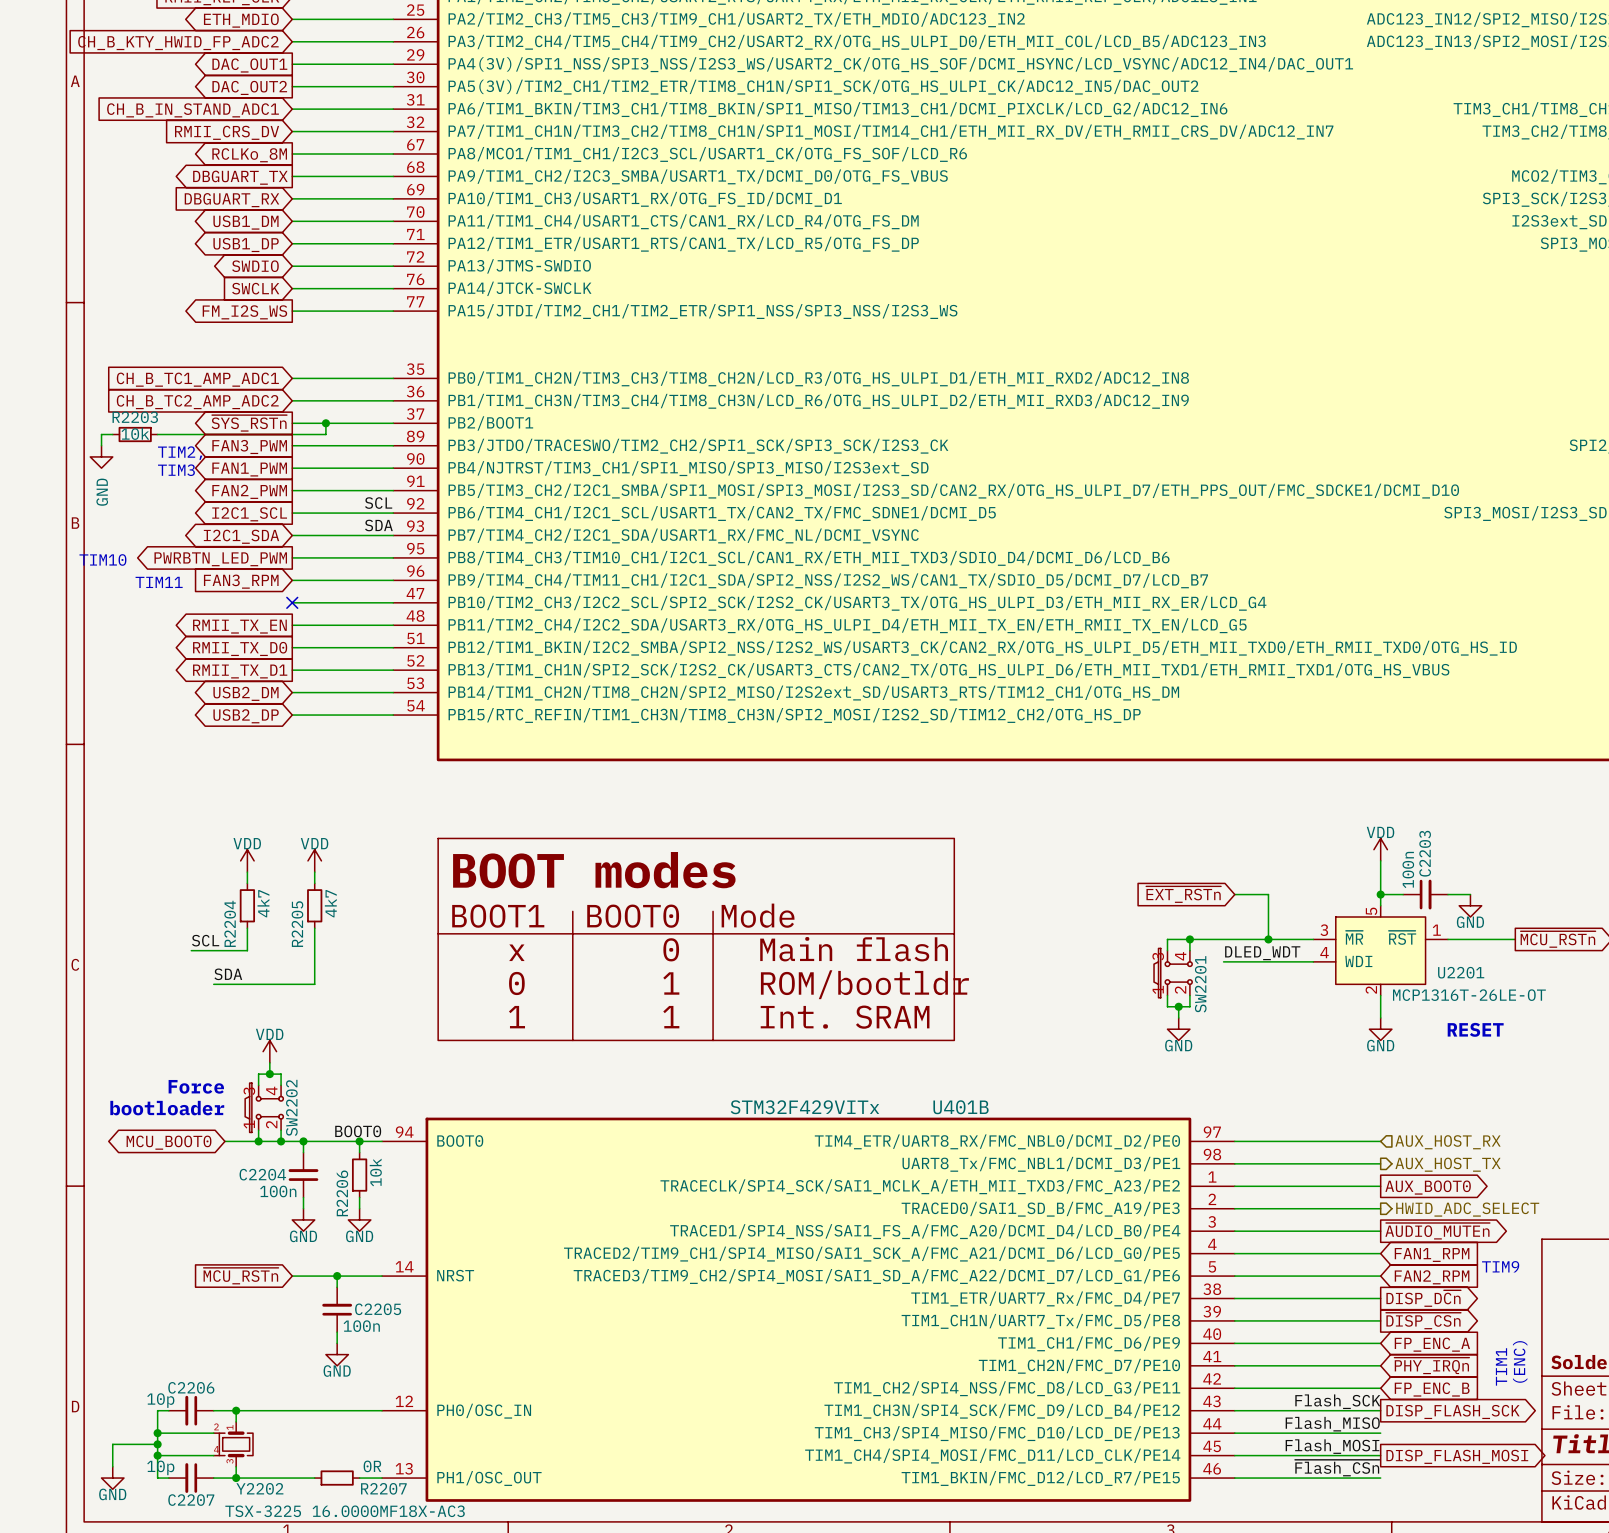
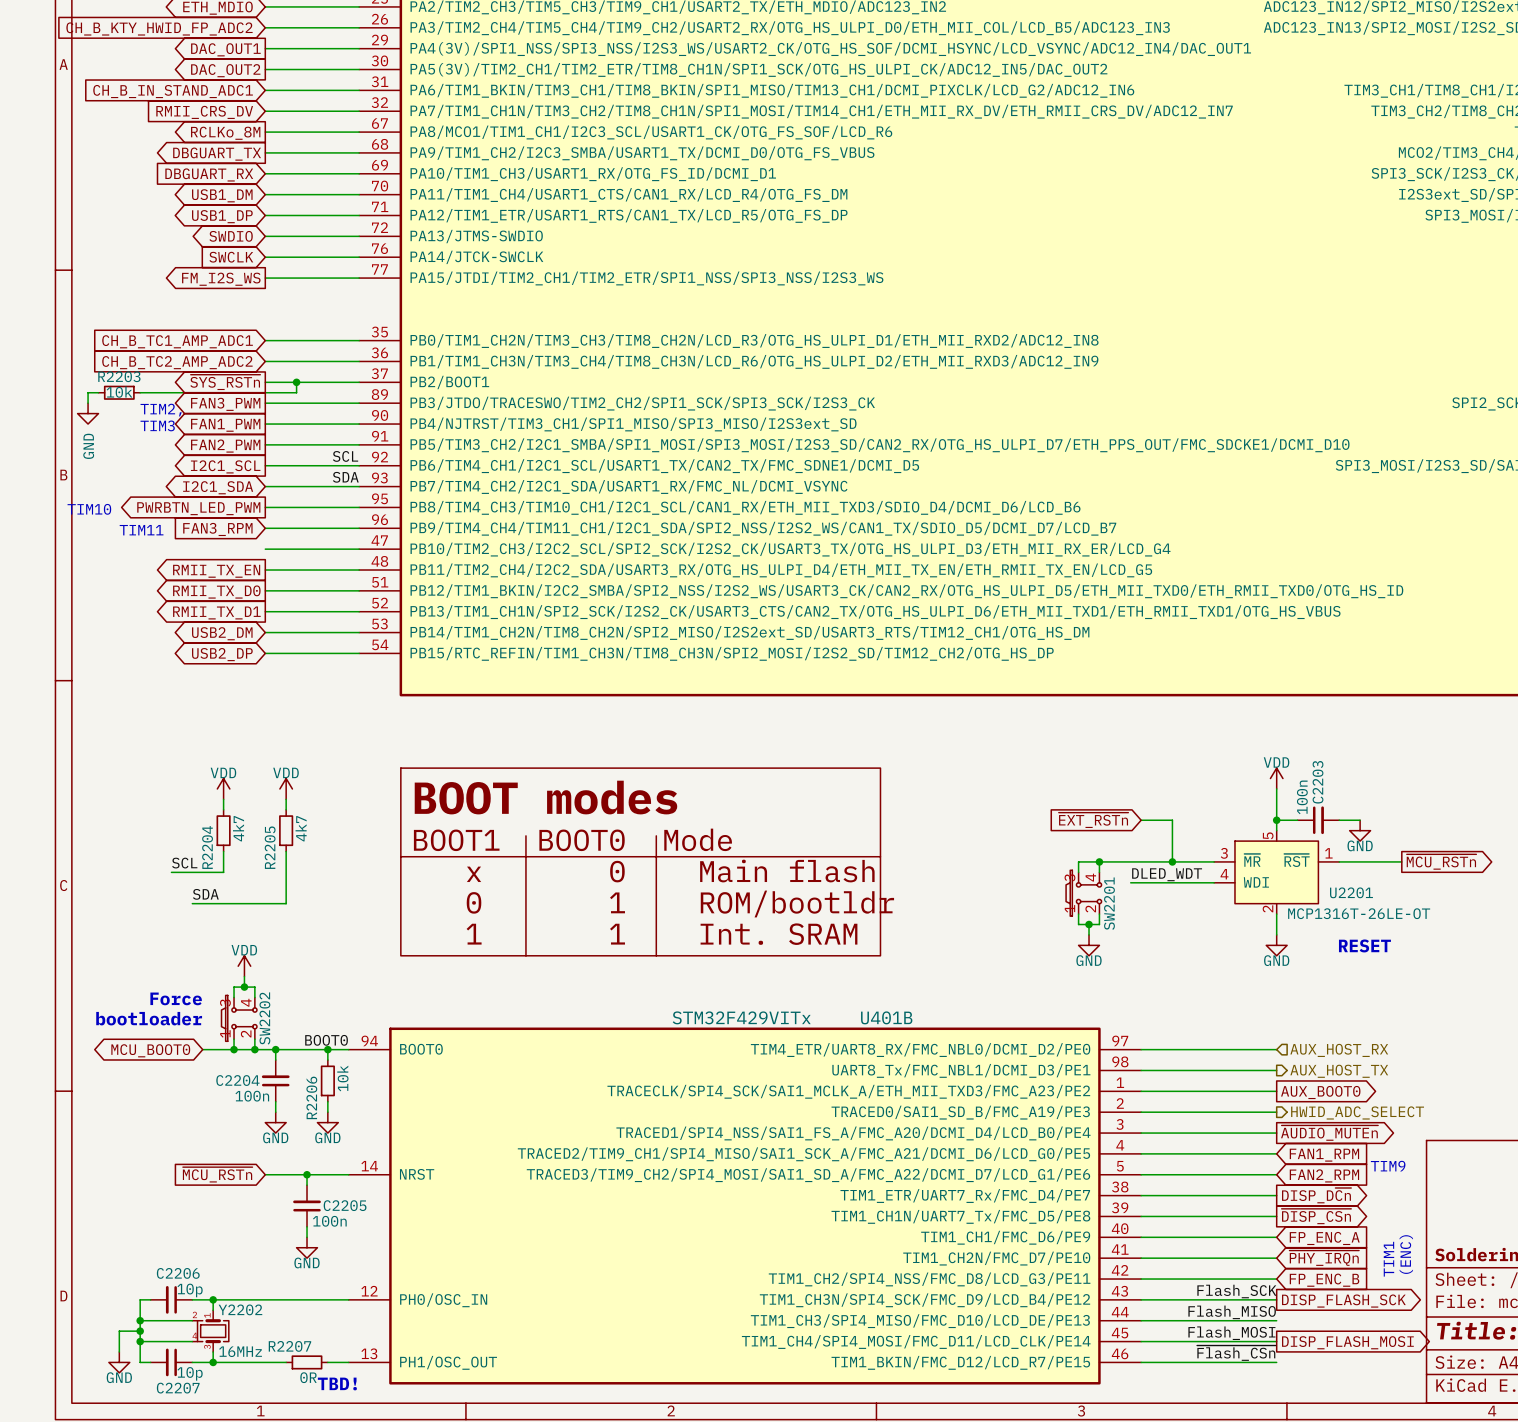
no-connect mark: (292, 602) -> none
C2206 name position: C2206 (191, 1387) -> C2206 (178, 1273)
C2206 value position: 10p (160, 1400) -> 10p (190, 1290)
wire: (135, 1444) (112, 1444) (112, 1466) -> (119, 1331) (119, 1352)
R2207 value position: 0R (372, 1466) -> 0R (308, 1377)
C2207 value position: 10p (160, 1467) -> 10p (190, 1373)
power symbol position: GND (112, 1478) -> GND (119, 1362)
Y2202 name position: Y2202 (259, 1488) -> Y2202 (240, 1309)
R2207 name position: R2207 (383, 1488) -> R2207 (289, 1346)
C2207 name position: C2207 (191, 1500) -> C2207 (178, 1388)
text: none -> TBD! (337, 1383)
Y2202 value: TSX-3225 16.0000MF18X-AC3 (345, 1511) -> 16MHz (240, 1351)

